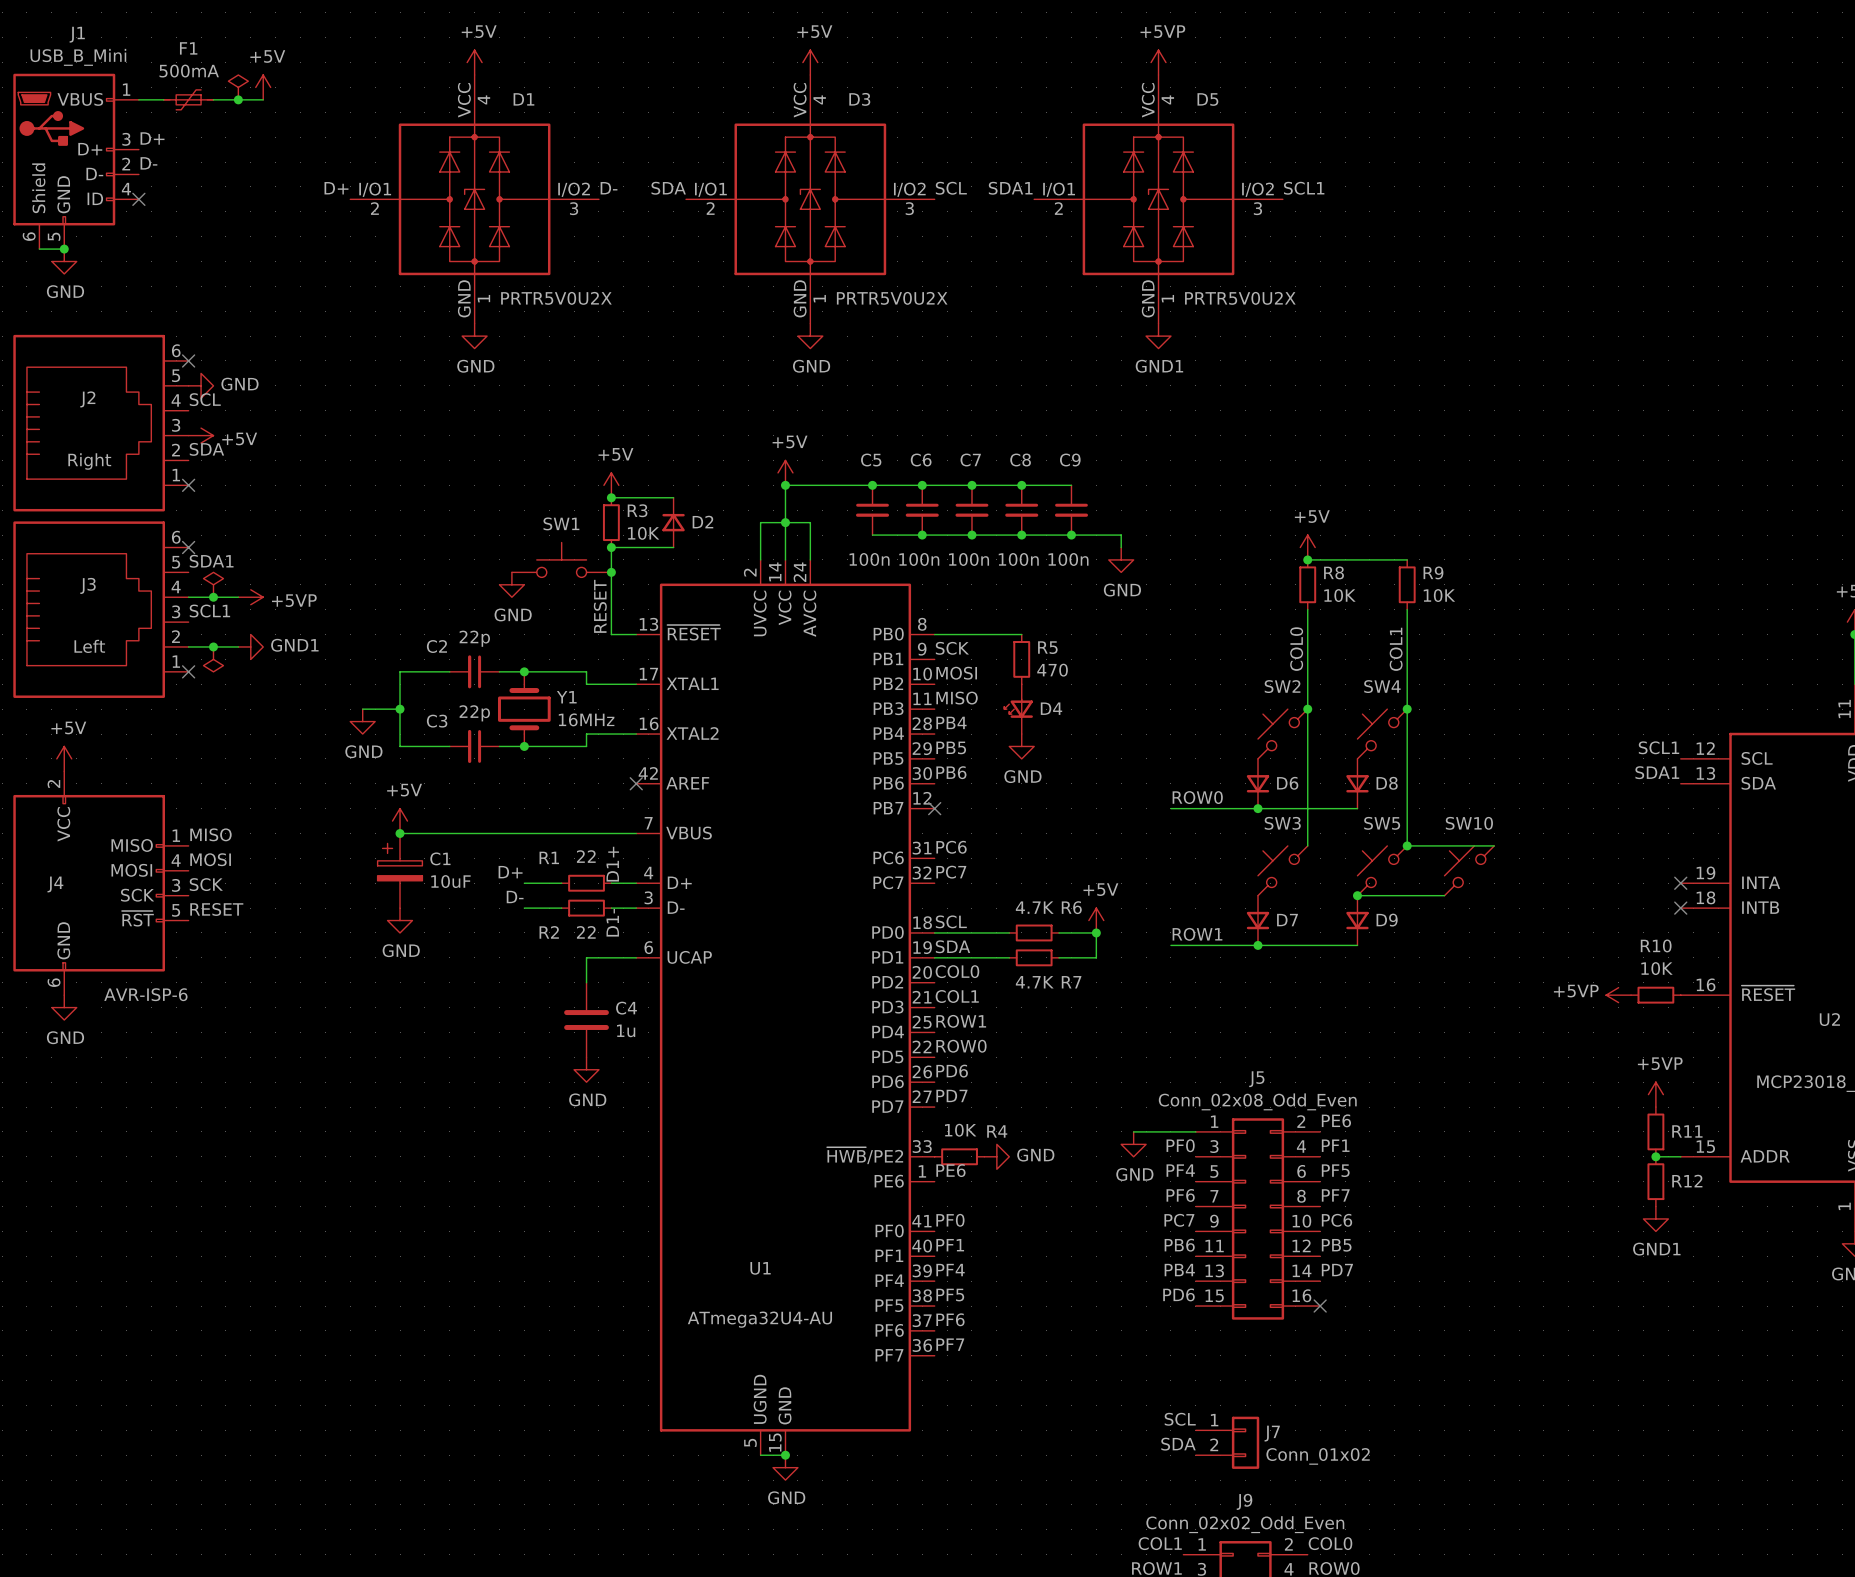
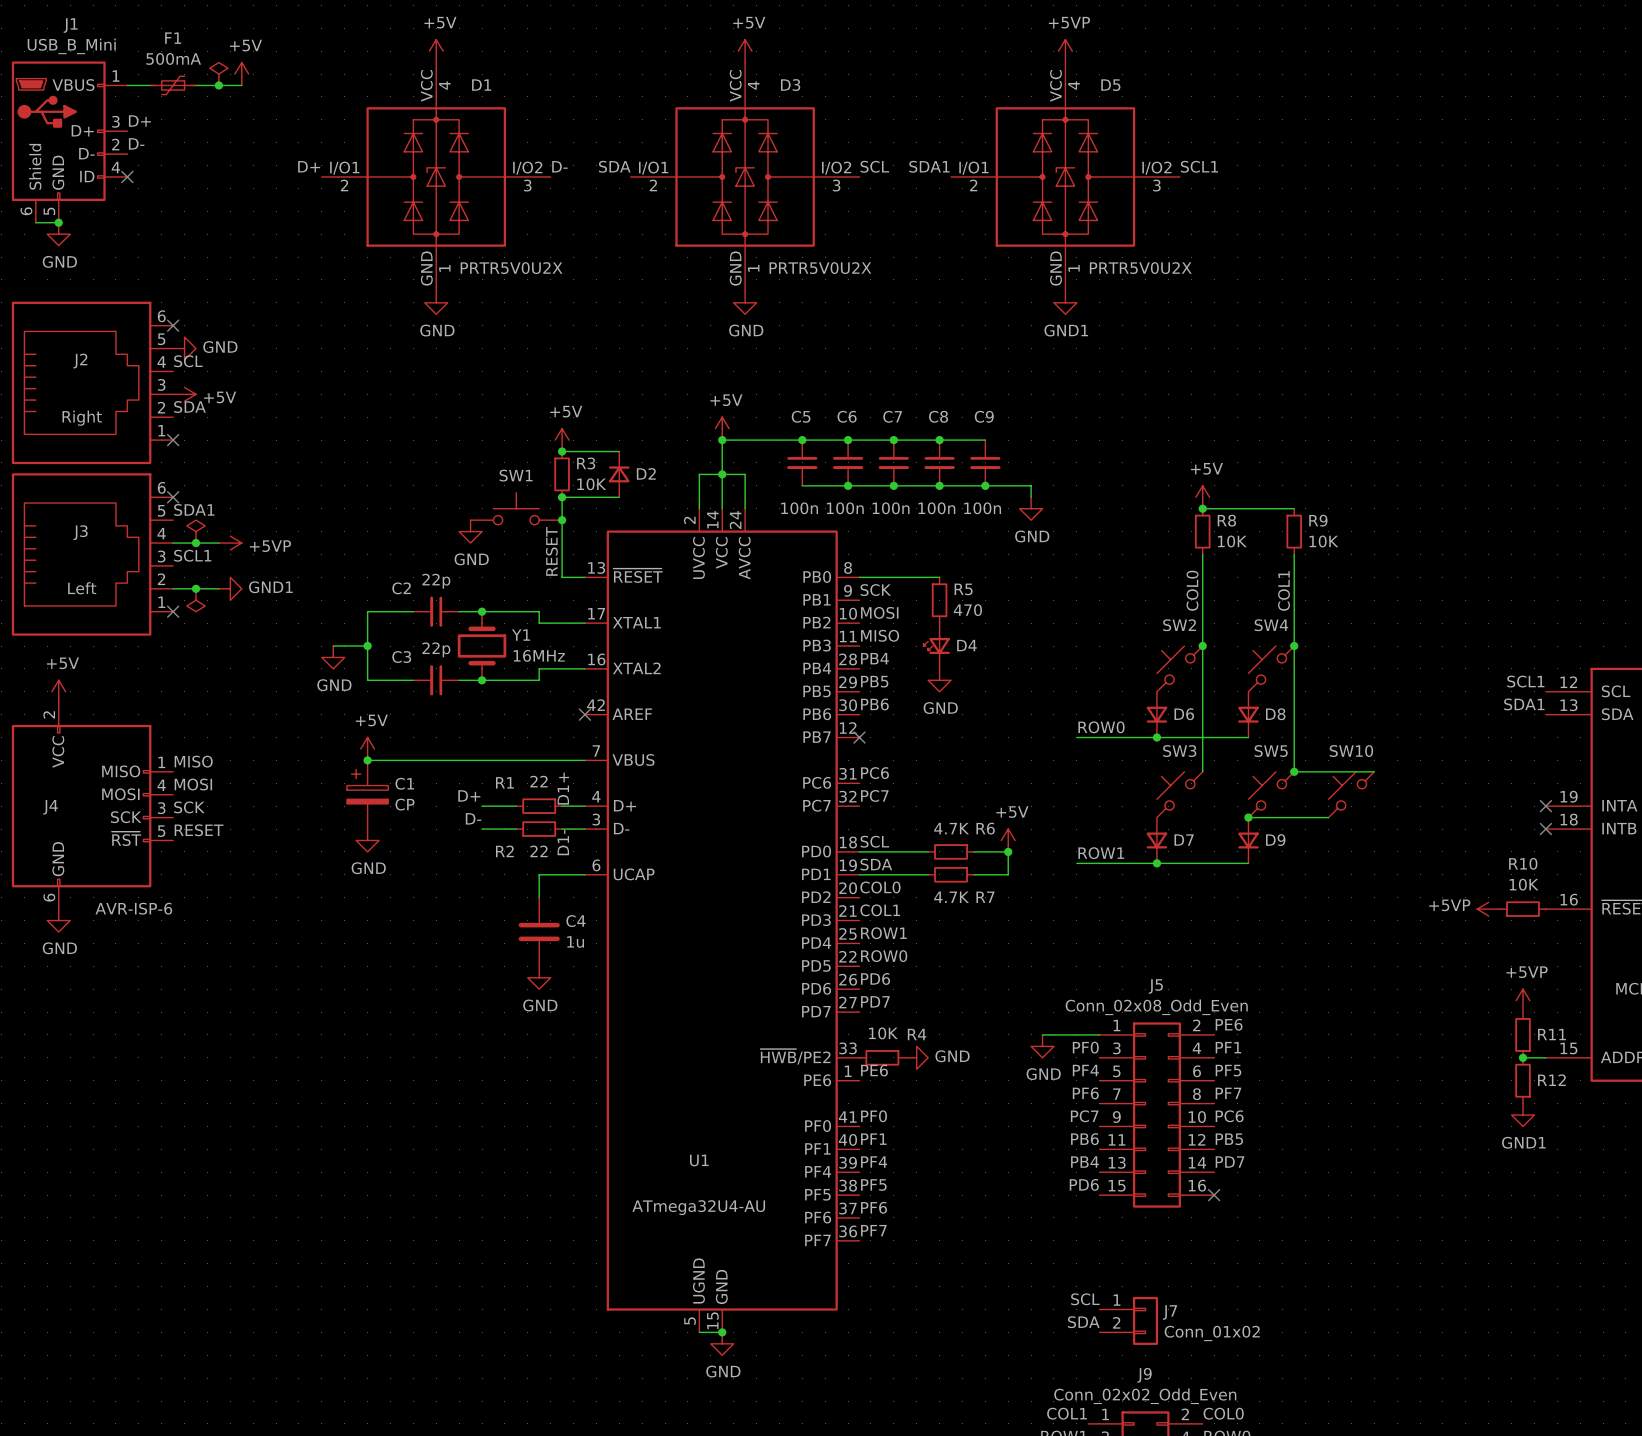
C1 value: 10uF (450, 881) -> CP (404, 804)

